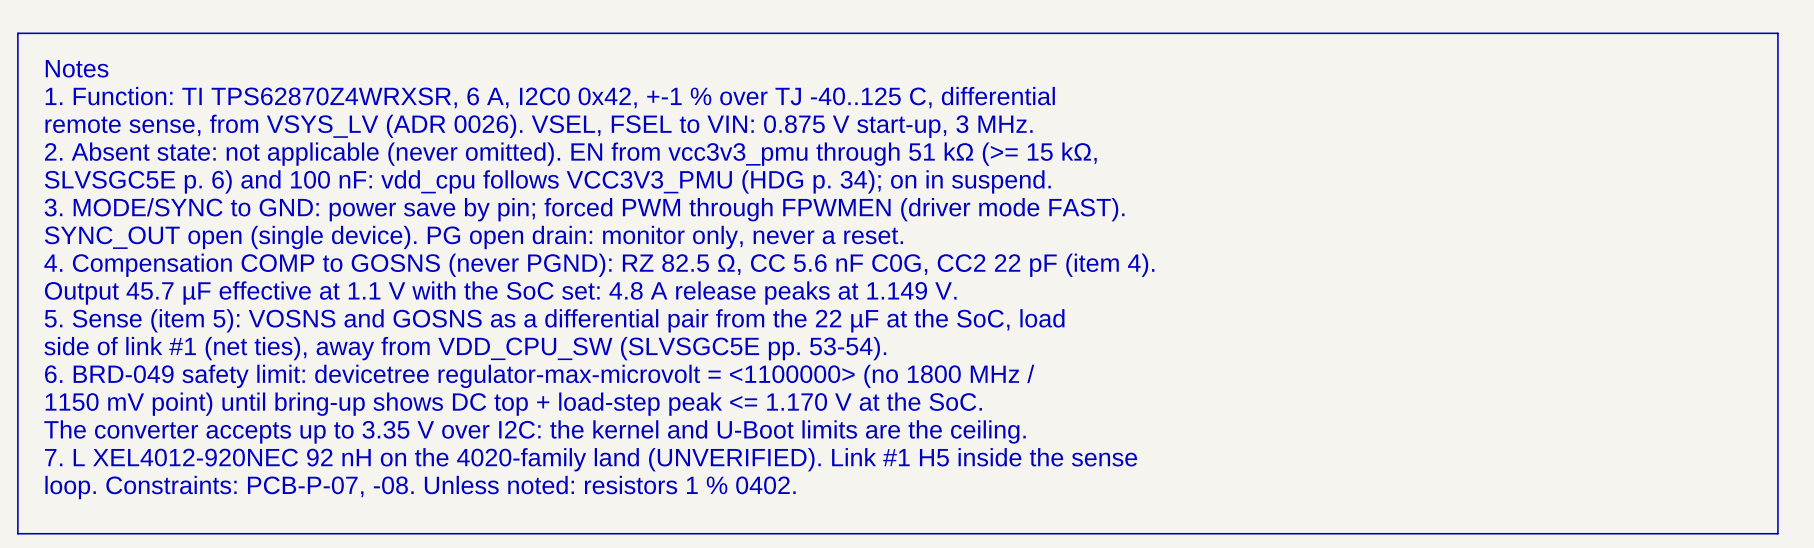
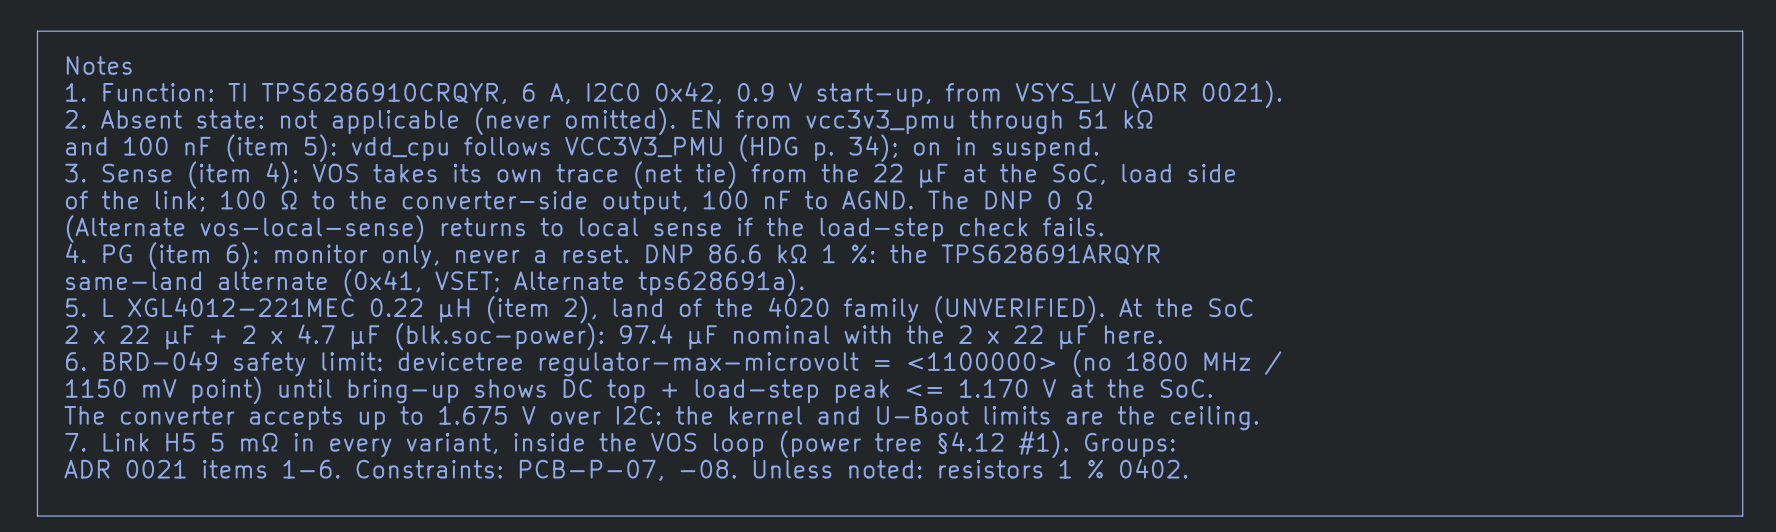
text: 1. Function: TI TPS62870Z4WRXSR, 6 A, I2C0 0x42, +-1 % over TJ -40..125 C, differential (550, 97) -> 1. Function: TI TPS6286910CRQYR, 6 A, I2C0 0x42, 0.9 V start-up, from VSYS_LV (ADR 0021). (673, 94)
text: remote sense, from VSYS_LV (ADR 0026). VSEL, FSEL to VIN: 0.875 V start-up, 3 MHz. (539, 126) -> 2. Absent state: not applicable (never omitted). EN from vcc3v3_pmu through 51 kΩ (608, 121)
text: 2. Absent state: not applicable (never omitted). EN from vcc3v3_pmu through 51 kΩ (>= 15 kΩ, (570, 154) -> and 100 nF (item 5): vdd_cpu follows VCC3V3_PMU (HDG p. 34); on in suspend. (582, 148)
text: SLVSGC5E p. 6) and 100 nF: vdd_cpu follows VCC3V3_PMU (HDG p. 34); on in suspend. (547, 181) -> 3. Sense (item 4): VOS takes its own trace (net tie) from the 22 µF at the SoC, load side (650, 175)
text: 3. MODE/SYNC to GND: power save by pin; forced PWM through FPWMEN (driver mode FAST). (584, 209) -> of the link; 100 Ω to the converter-side output, 100 nF to AGND. The DNP 0 Ω (578, 202)
text: SYNC_OUT open (single device). PG open drain: monitor only, never a reset. (473, 237) -> (Alternate vos-local-sense) returns to local sense if the load-step check fails. (584, 228)
text: 4. Compensation COMP to GOSNS (never PGND): RZ 82.5 Ω, CC 5.6 nF C0G, CC2 22 pF (item 4). (599, 265) -> 4. PG (item 6): monitor only, never a reset. DNP 86.6 kΩ 1 %: the TPS628691ARQYR (612, 255)
text: Output 45.7 µF effective at 1.1 V with the SoC set: 4.8 A release peaks at 1.149 V. (500, 293) -> same-land alternate (0x41, VSET; Alternate tps628691a). (434, 282)
text: 5. Sense (item 5): VOSNS and GOSNS as a differential pair from the 22 µF at the SoC, load (554, 320) -> 5. L XGL4012-221MEC 0.22 µH (item 2), land of the 4020 family (UNVERIFIED). At the SoC (659, 309)
text: side of link #1 (net ties), away from VDD_CPU_SW (SLVSGC5E pp. 53-54). (465, 348) -> 2 x 22 µF + 2 x 4.7 µF (blk.soc-power): 97.4 µF nominal with the 2 x 22 µF here. (613, 336)
text: The converter accepts up to 3.35 V over I2C: the kernel and U-Boot limits are the ceiling. (535, 431) -> The converter accepts up to 1.675 V over I2C: the kernel and U-Boot limits are the ceiling. (661, 418)
text: 7. L XEL4012-920NEC 92 nH on the 4020-family land (UNVERIFIED). Link #1 H5 inside the sense (591, 459) -> 7. Link H5 5 mΩ in every variant, inside the VOS loop (power tree §4.12 #1). Groups: (619, 444)
text: loop. Constraints: PCB-P-07, -08. Unless noted: resistors 1 % 0402. (420, 487) -> ADR 0021 items 1-6. Constraints: PCB-P-07, -08. Unless noted: resistors 1 % 0402. (625, 469)

